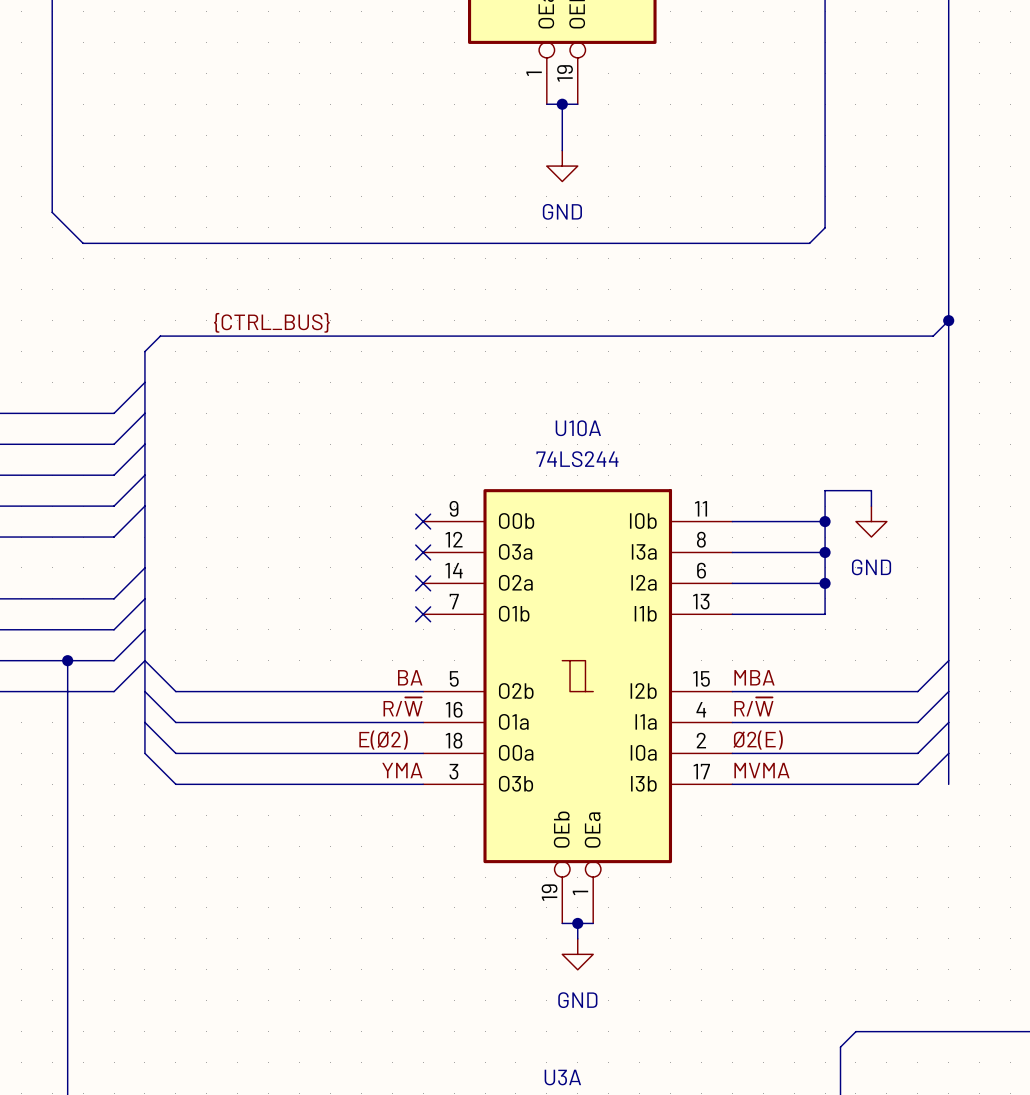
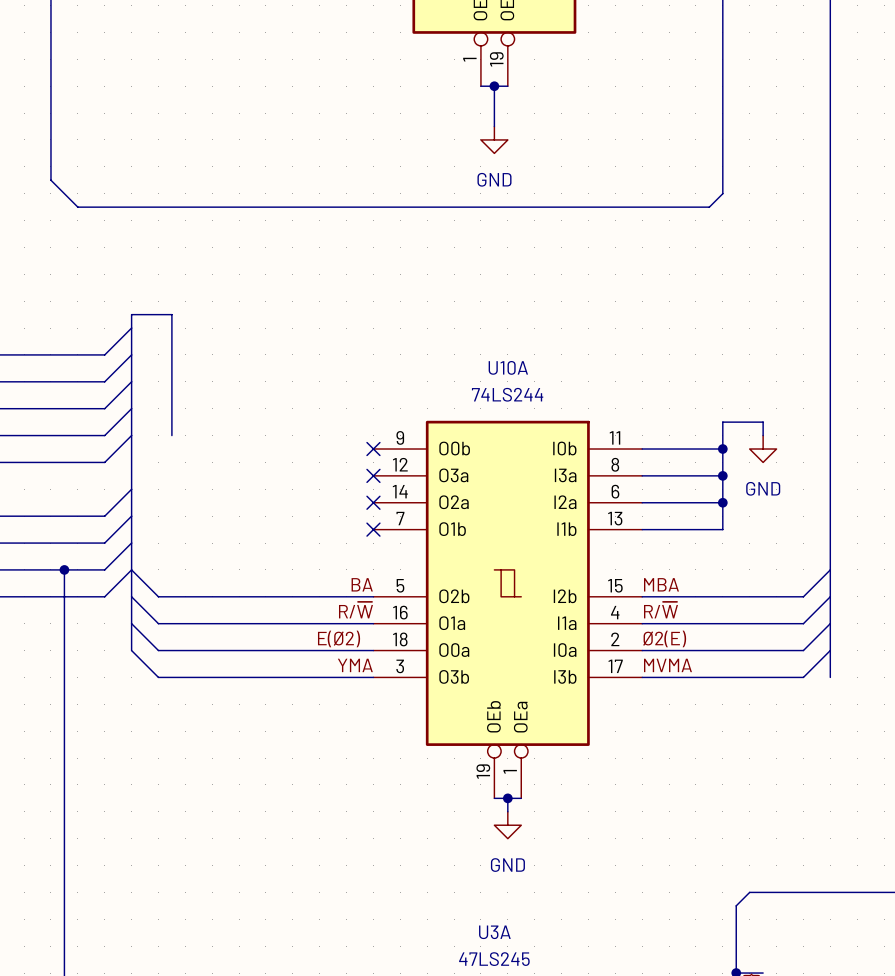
bus: (948, 320) (933, 336) (160, 336) (144, 351) (144, 367) -> (171, 435) (171, 314) (131, 314)
junction: (948, 320) -> none
label: {CTRL_BUS} (271, 322) -> none

